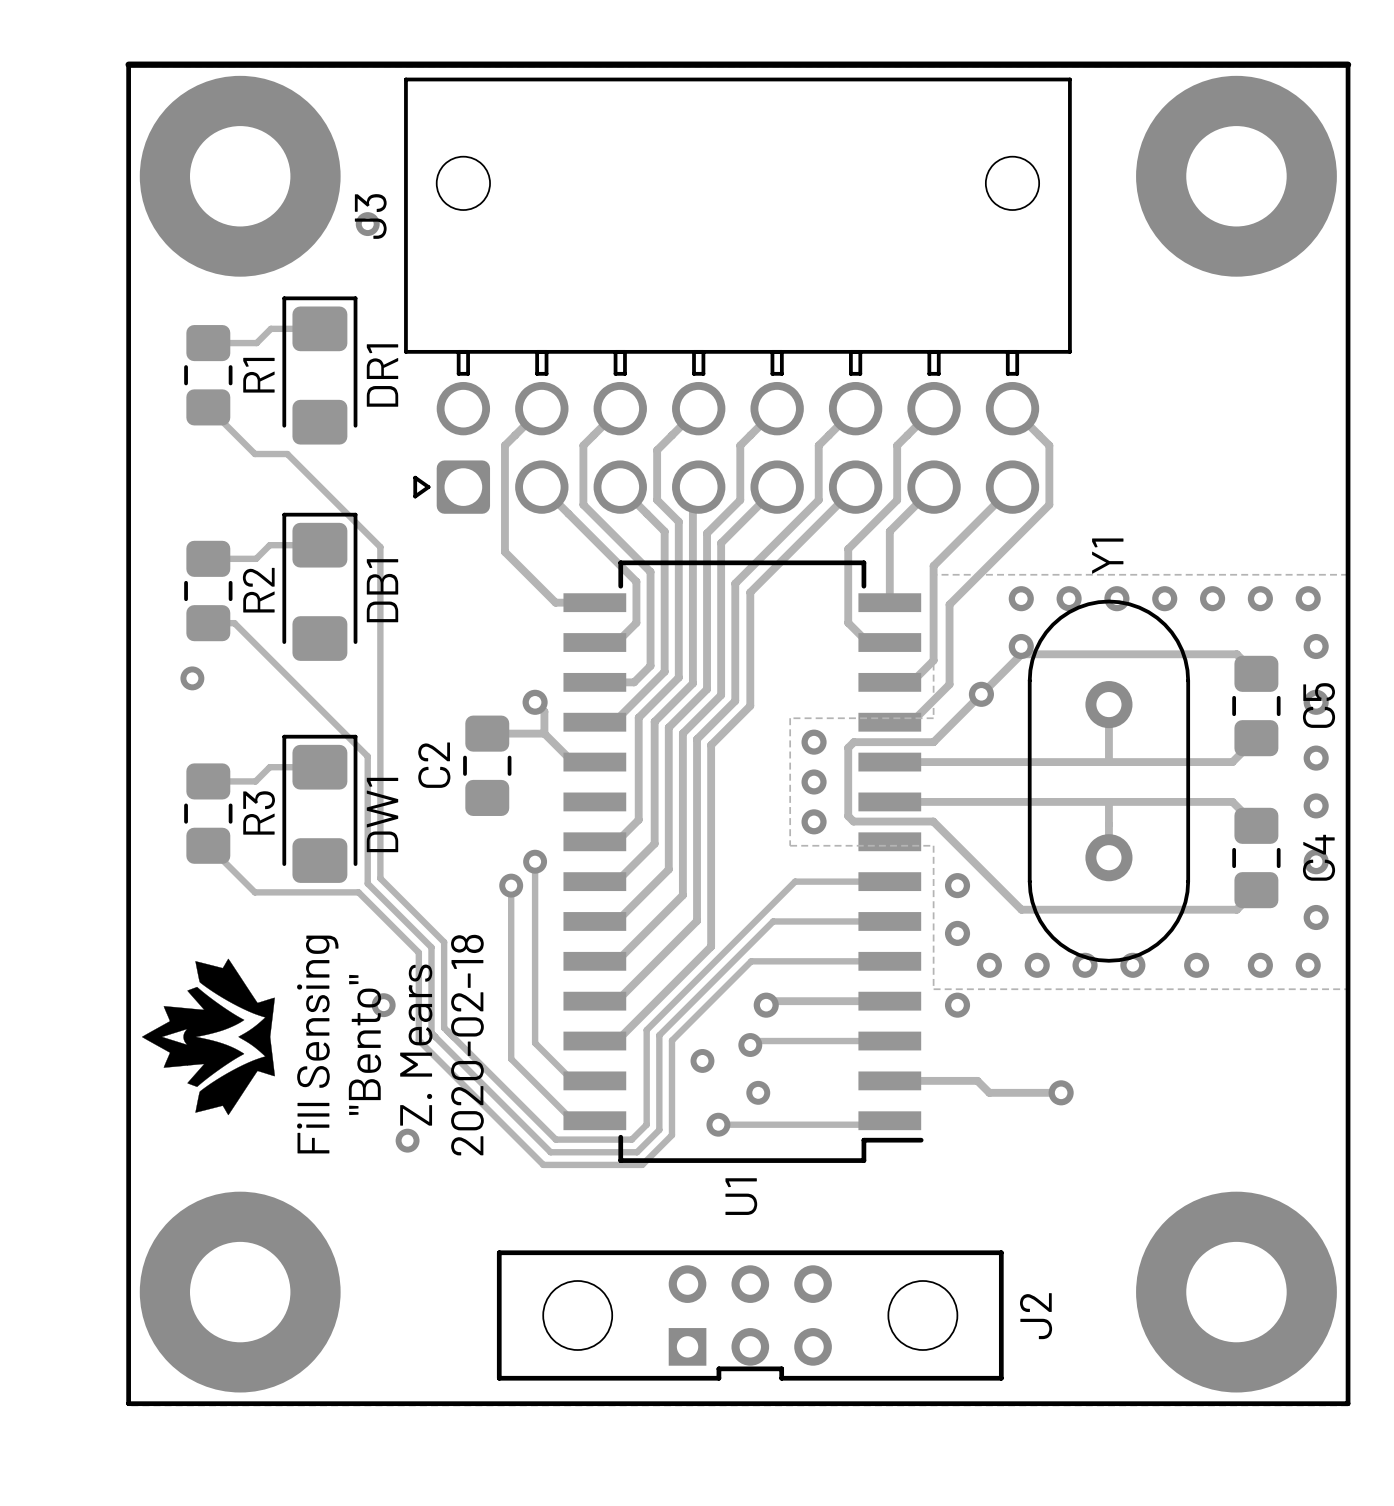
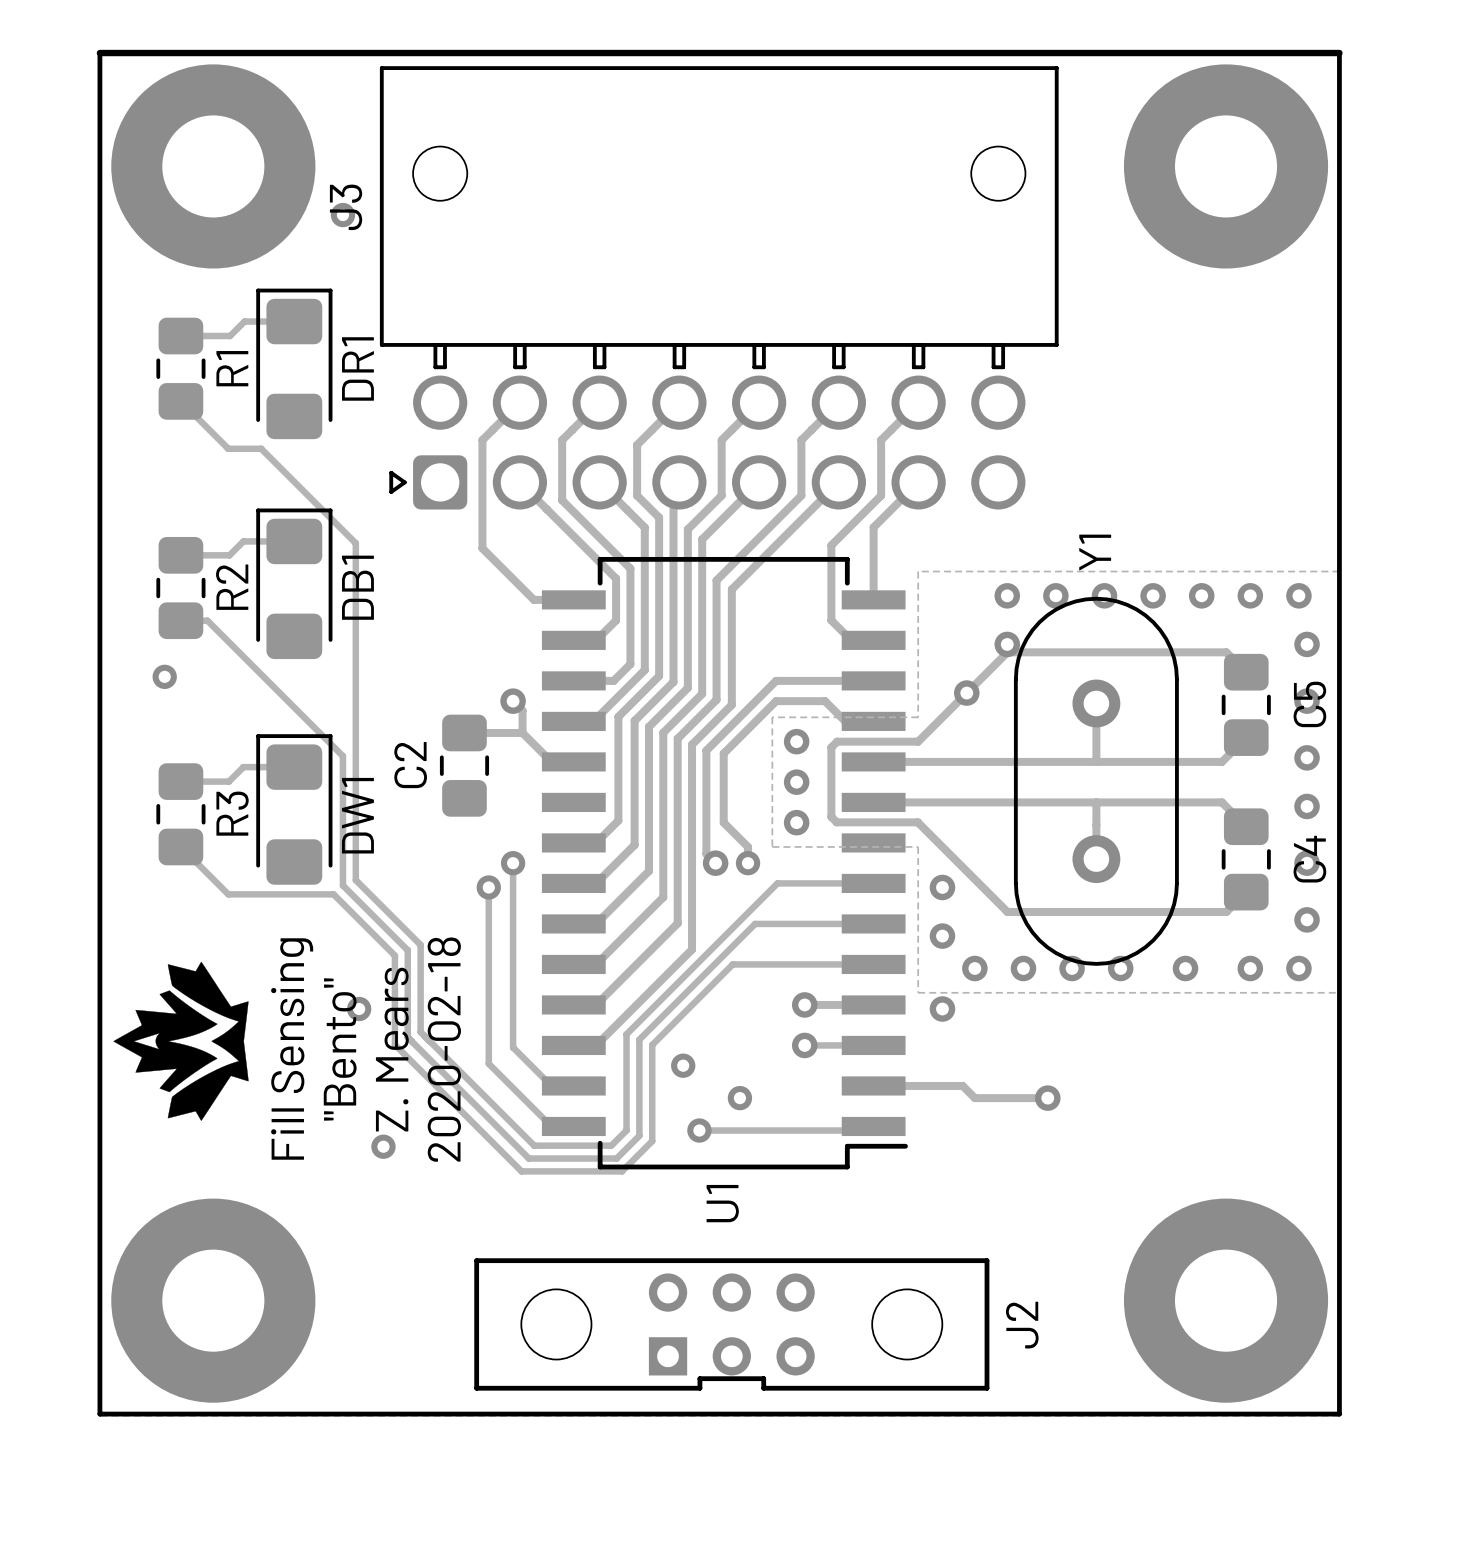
track: (1012, 408) (1049, 445) (1049, 504) (949, 604) (949, 684) (911, 722) -> none
track: (1012, 487) (933, 565) (933, 660) (911, 682) -> none
track: none -> (873, 680) (776, 680) (706, 750) (706, 853) (715, 863)
track: none -> (873, 721) (845, 721) (824, 701) (776, 701) (723, 753) (723, 822) (748, 846) (748, 863)
via: none -> (715, 863)
track: (822, 1001) (770, 1001) (766, 1005) -> none
via: none -> (804, 1004)
via: (766, 1005) -> none
track: (822, 1041) (754, 1041) (750, 1045) -> none
via: none -> (804, 1045)
via position: (750, 1045) -> (748, 863)

